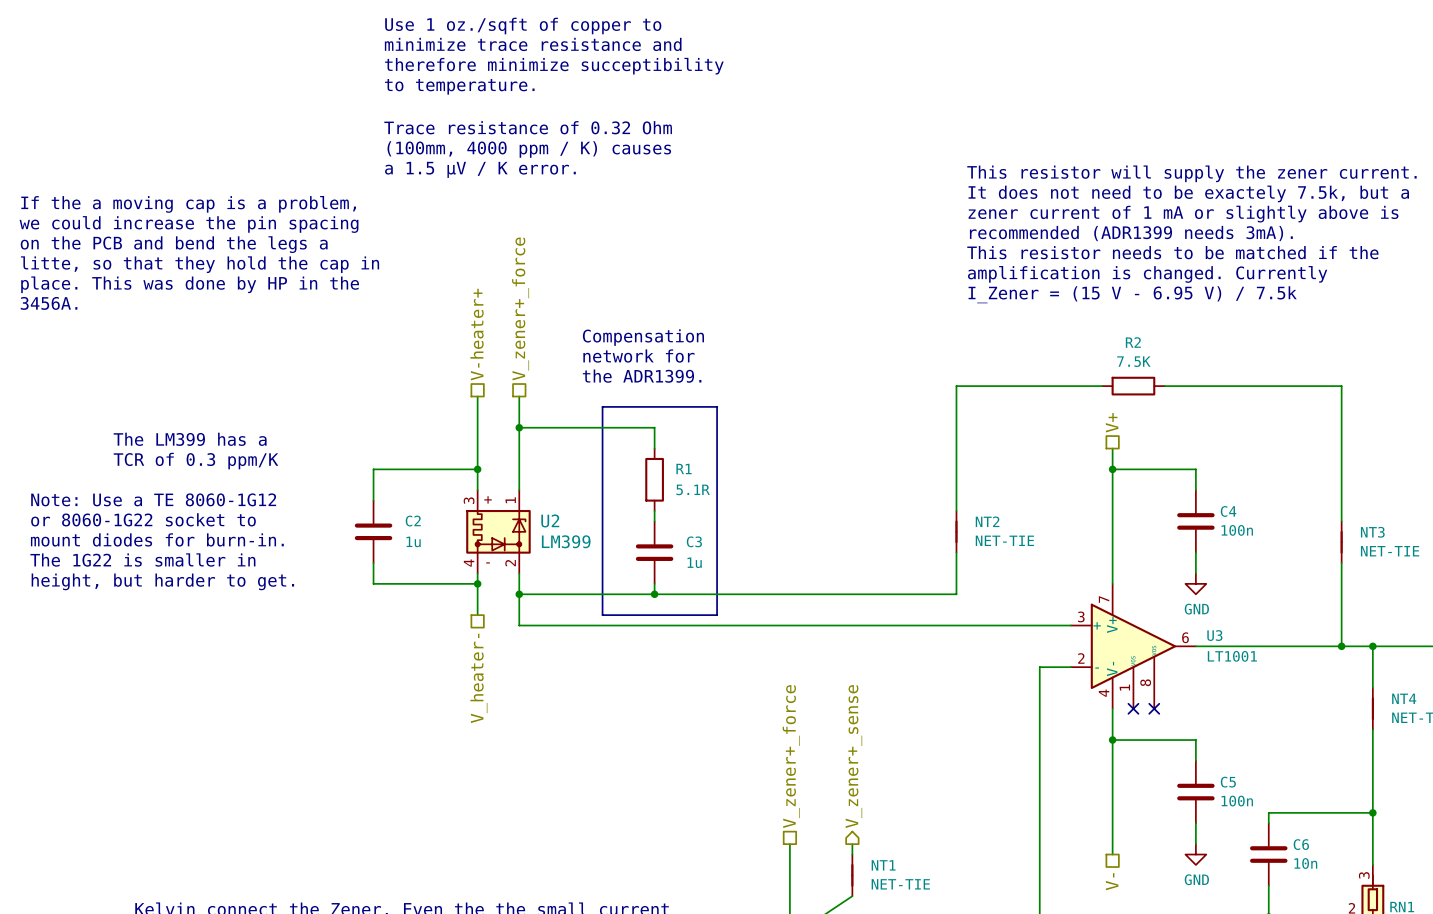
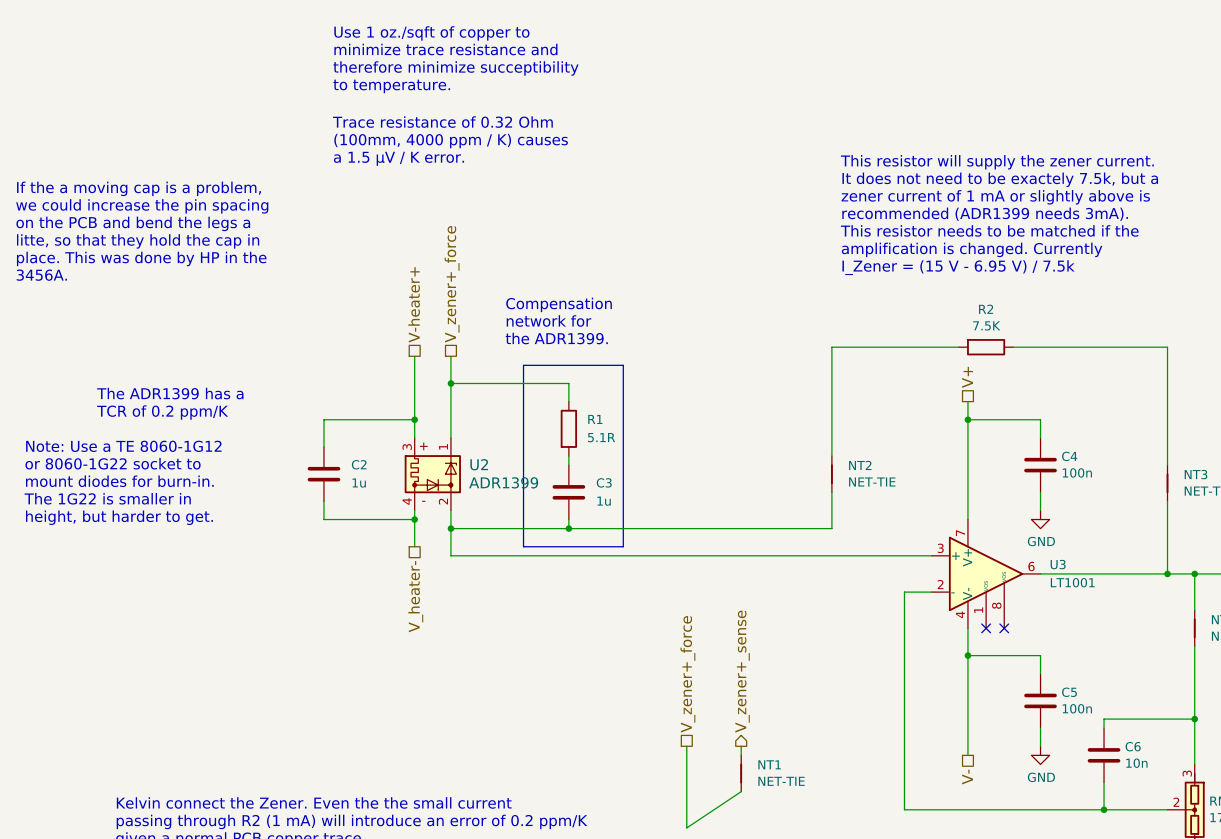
text: The LM399 has a (190, 439) -> The ADR1399 has a (170, 393)
text: TCR of 0.3 ppm/K (195, 461) -> TCR of 0.2 ppm/K (162, 412)
U2 value: LM399 (566, 541) -> ADR1399 (503, 482)

